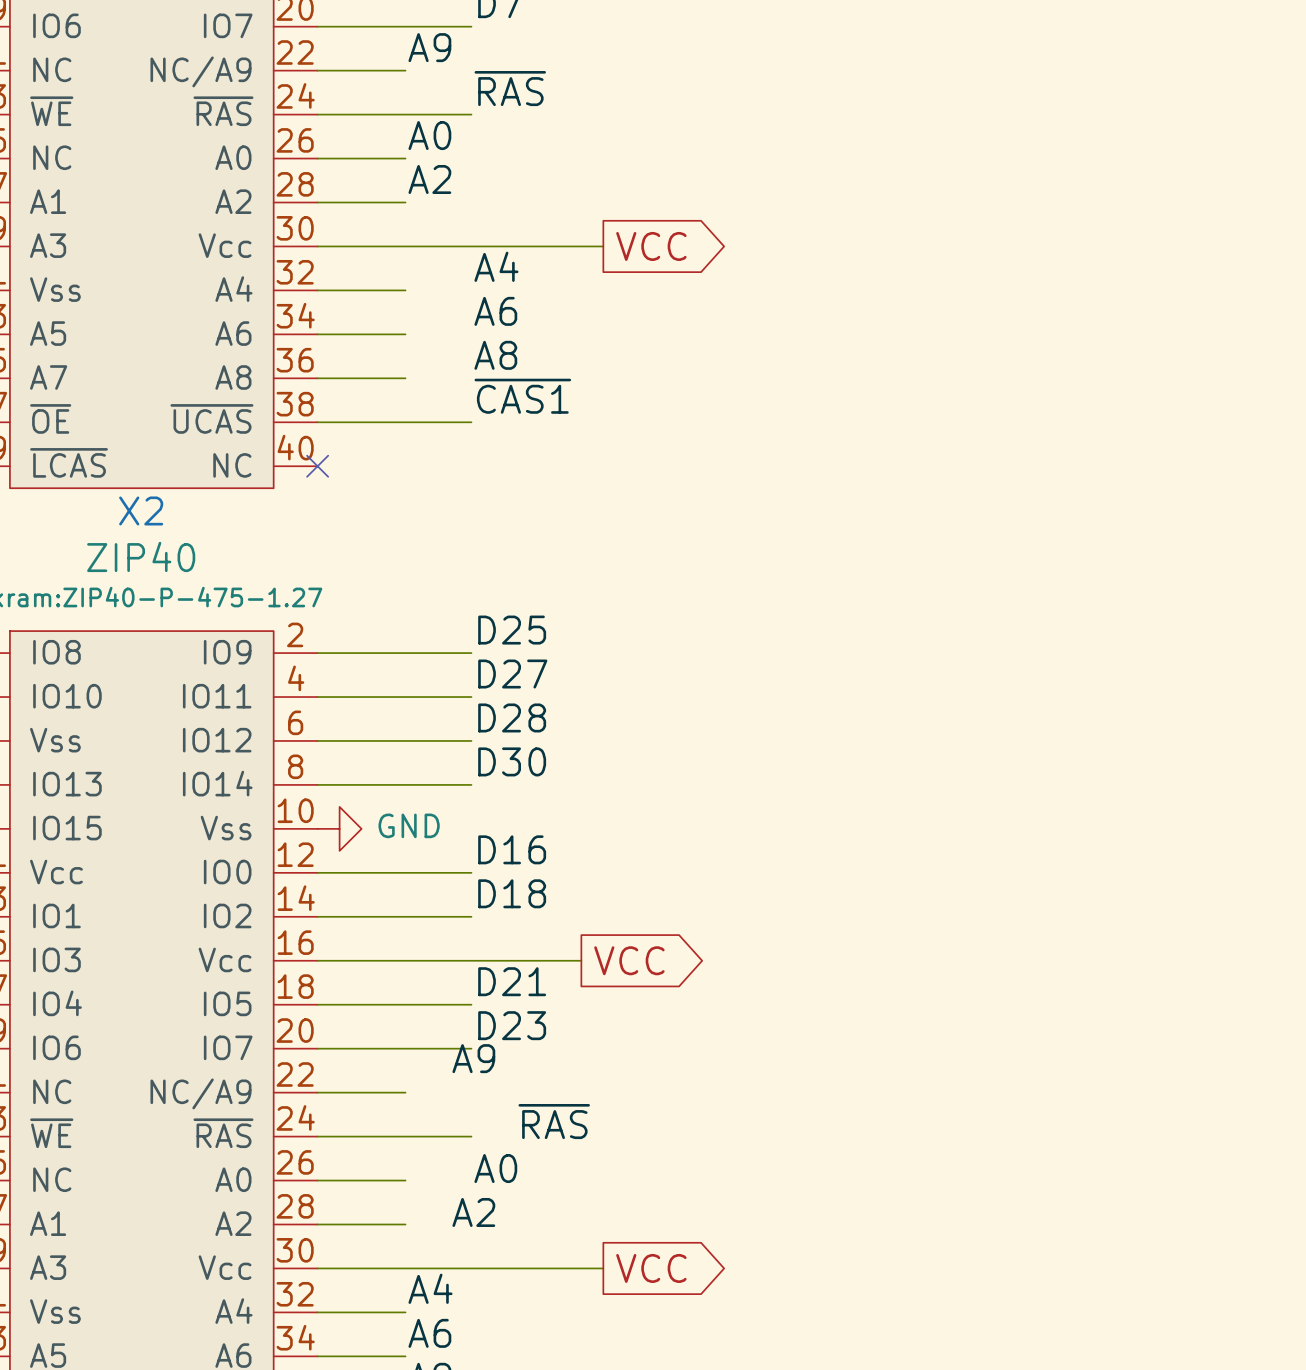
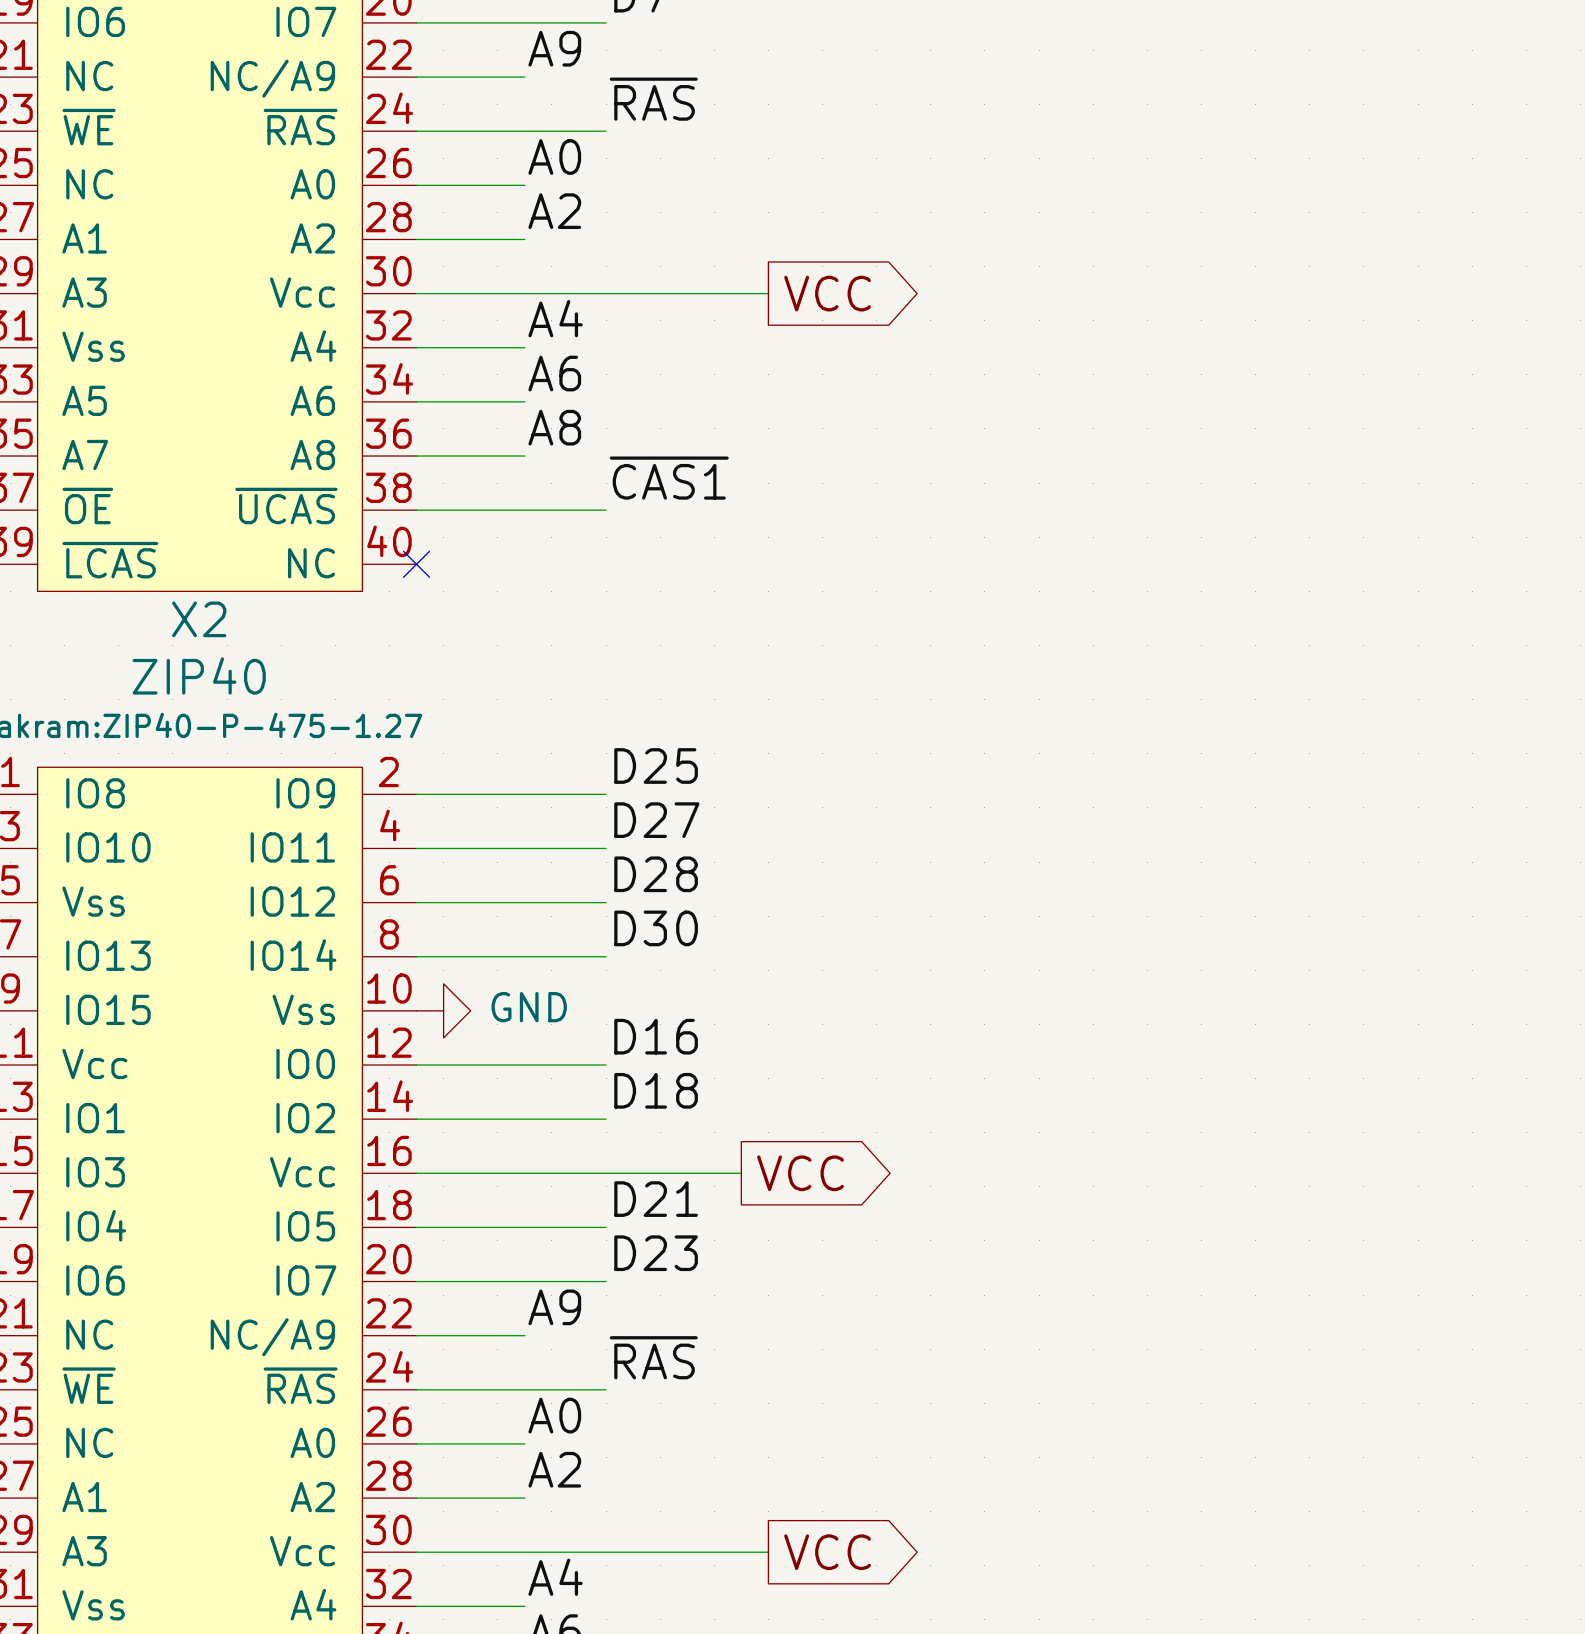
label position: A4 (496, 266) -> A4 (555, 318)
label position: A6 (495, 311) -> A6 (554, 373)
label position: A8 (495, 355) -> A8 (554, 427)
label position: A9 (473, 1058) -> A9 (554, 1307)
label position: ~{RAS} (554, 1121) -> ~{RAS} (653, 1357)
label position: A0 (495, 1168) -> A0 (554, 1415)
label position: A2 (473, 1212) -> A2 (554, 1469)

